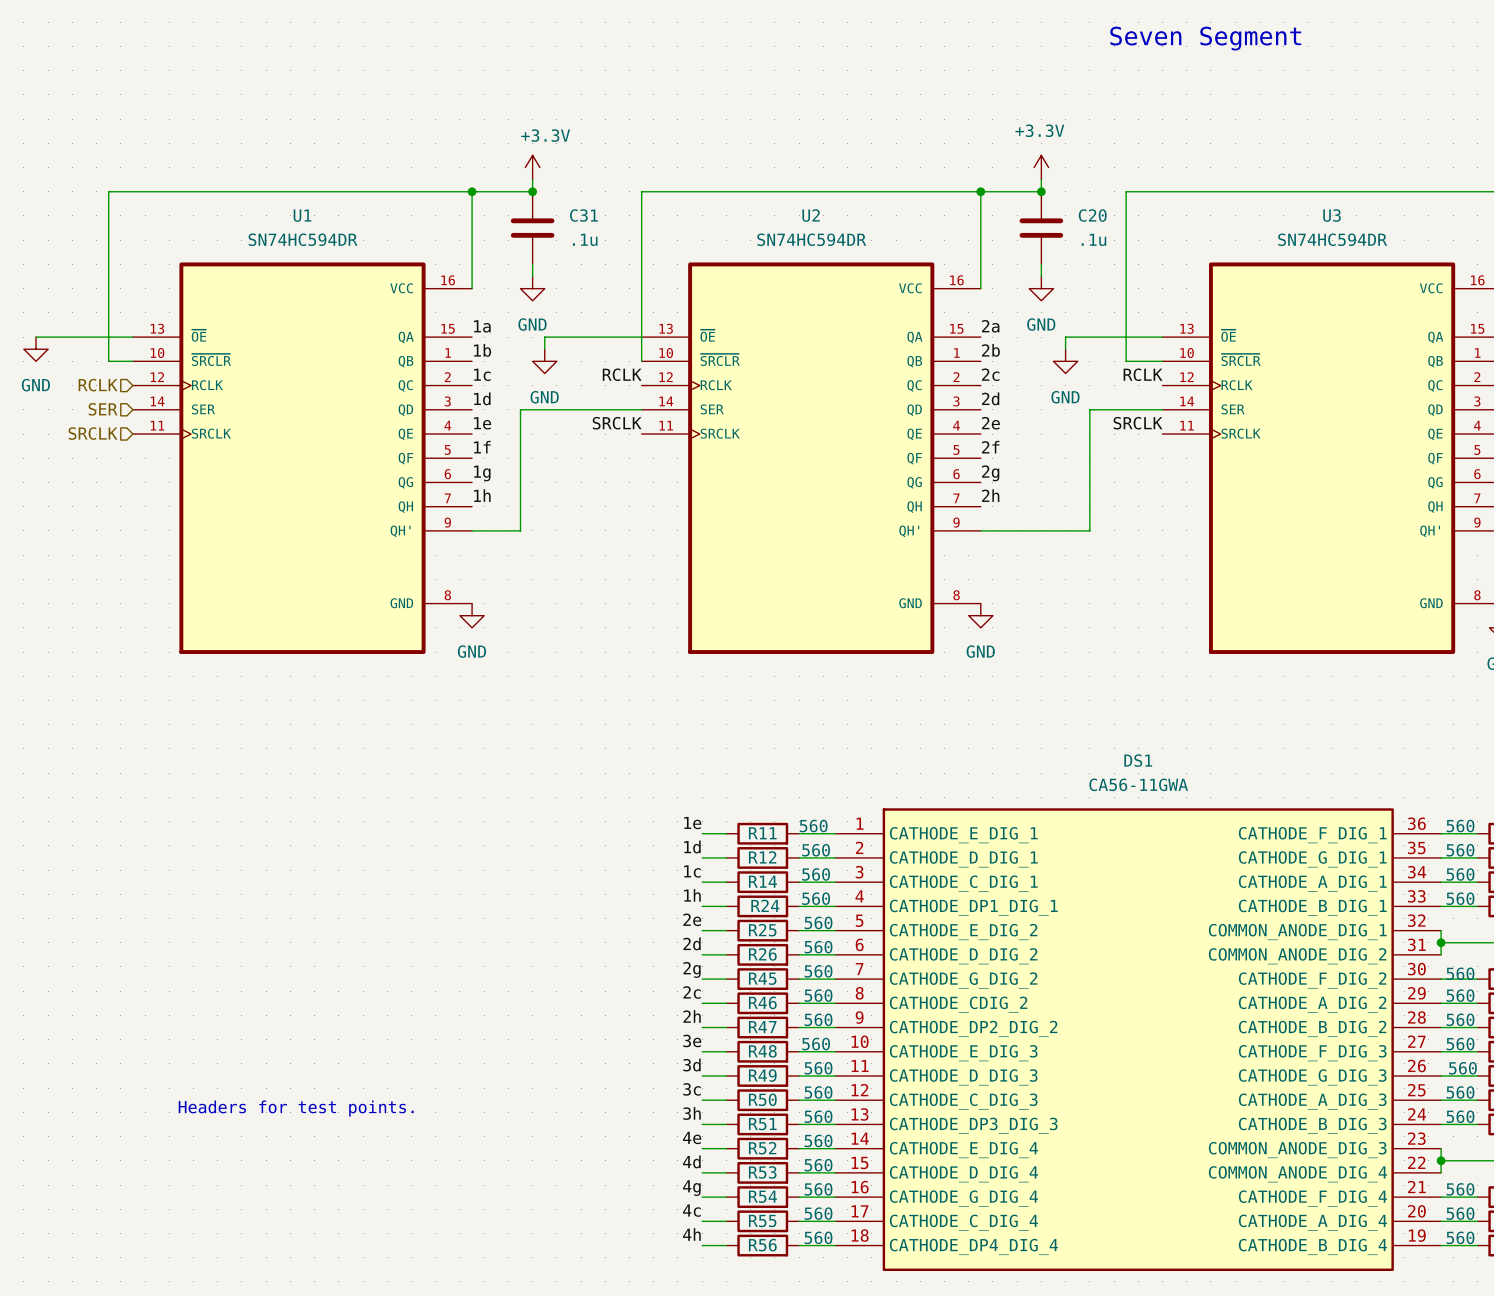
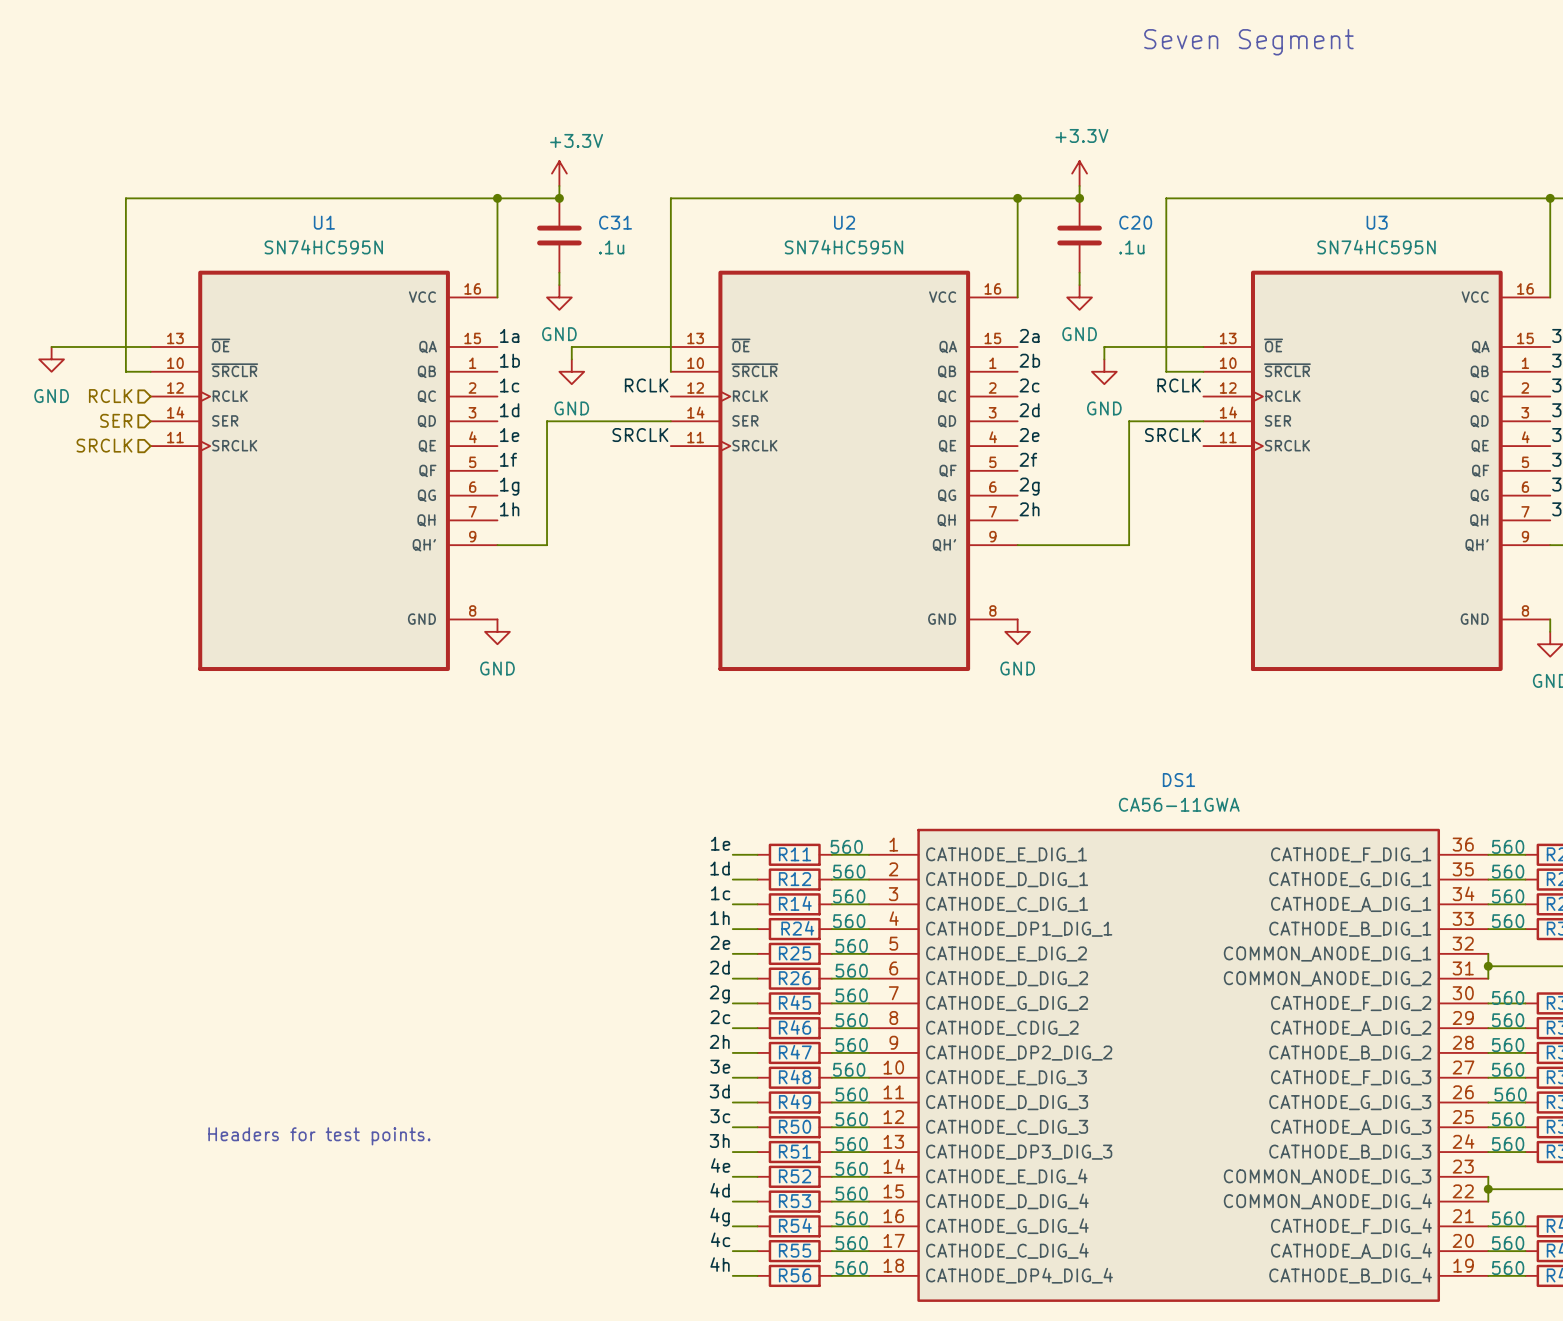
U1 value: SN74HC594DR (303, 239) -> SN74HC595N (323, 247)
U2 value: SN74HC594DR (811, 239) -> SN74HC595N (843, 247)
U3 value: SN74HC594DR (1332, 239) -> SN74HC595N (1376, 247)

